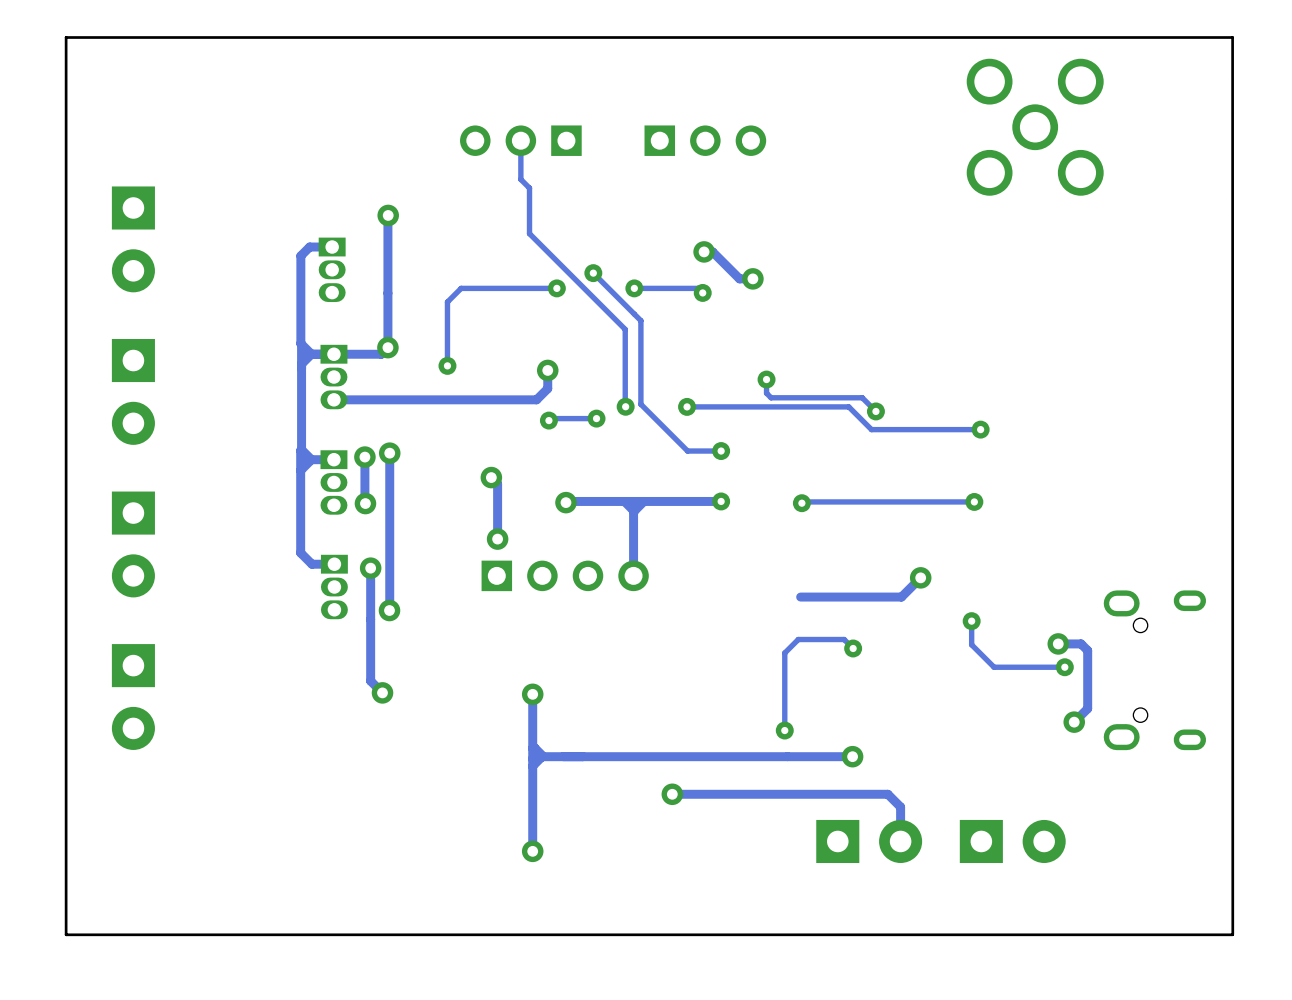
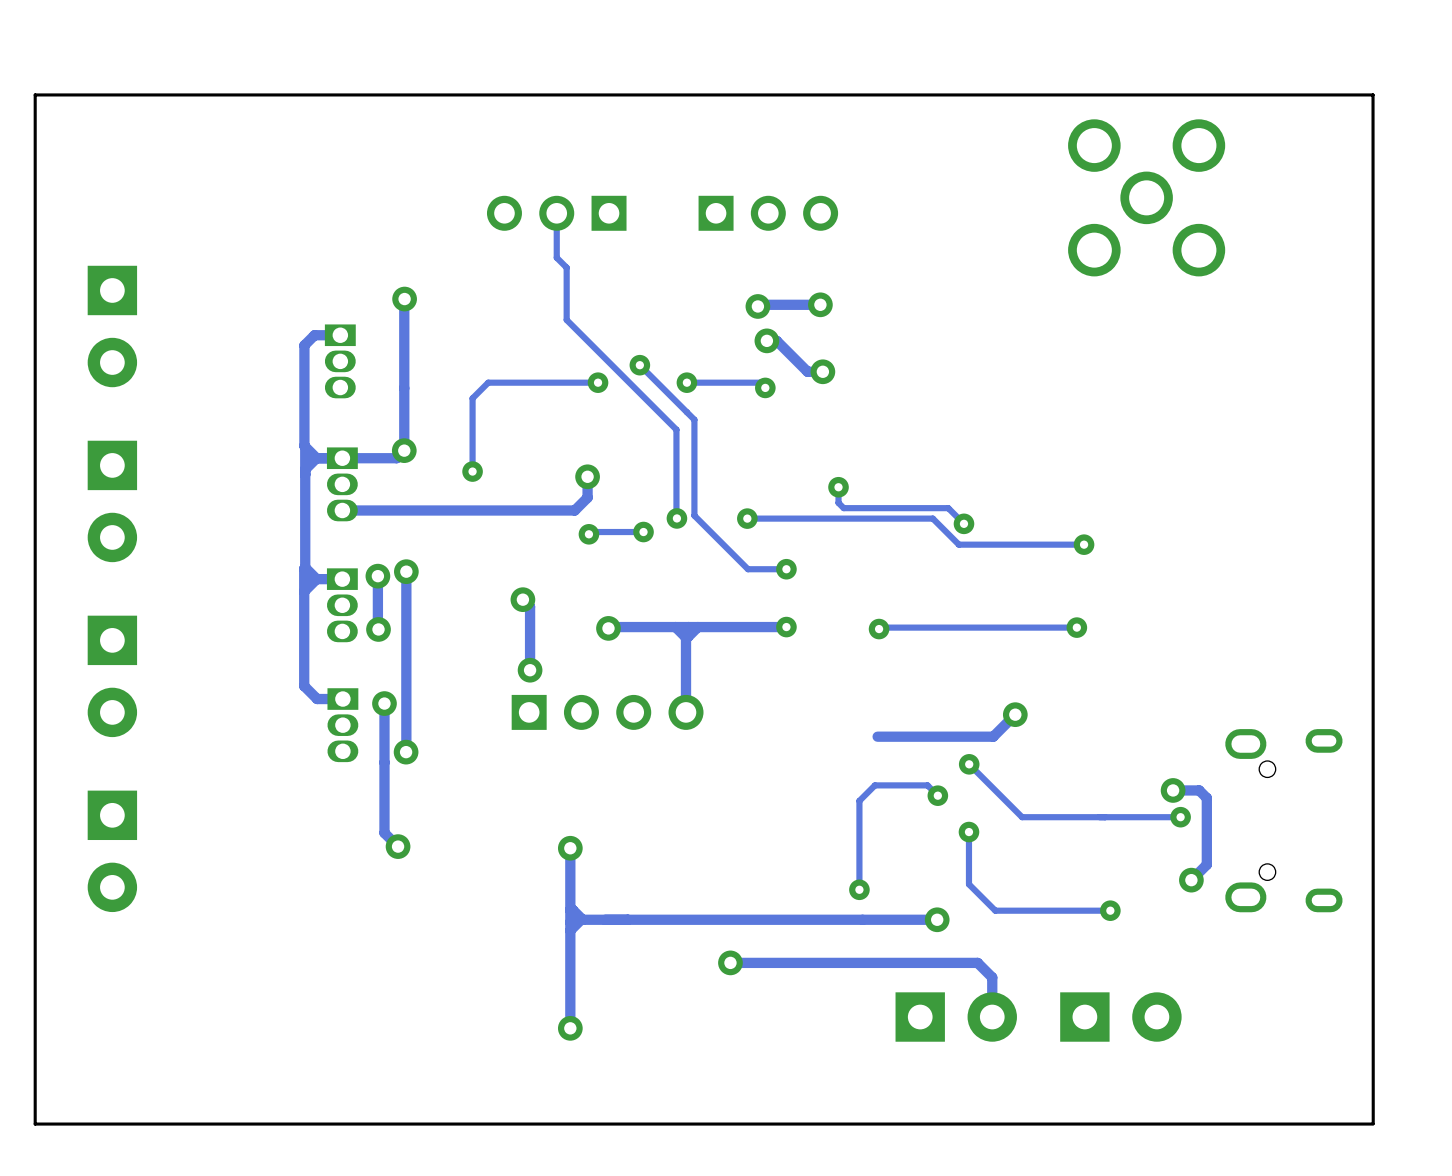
track: none -> (820, 304) (759, 304) (757, 306)
via: none -> (820, 304)
via: none -> (757, 306)
via: none -> (969, 764)
track: (971, 621) (971, 644) (994, 667) -> (969, 764) (1022, 817) (1099, 817)
via: (971, 621) -> none
track: none -> (968, 832) (968, 884) (995, 910) (1110, 910)
via: none -> (968, 832)
via: none -> (1110, 910)

